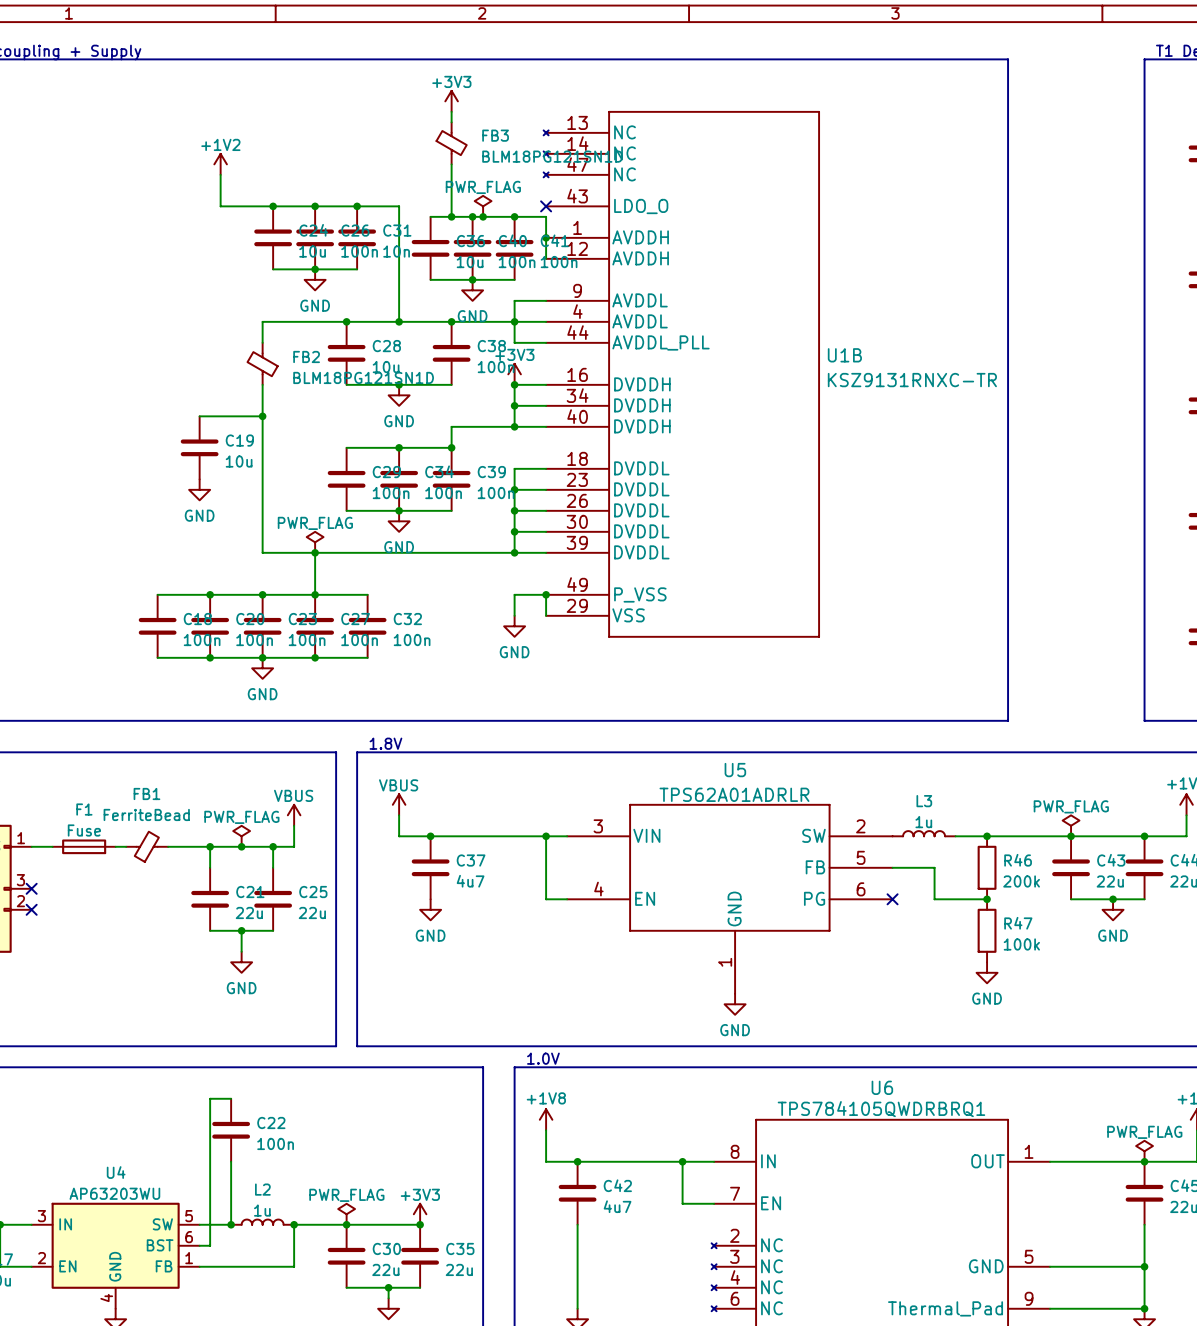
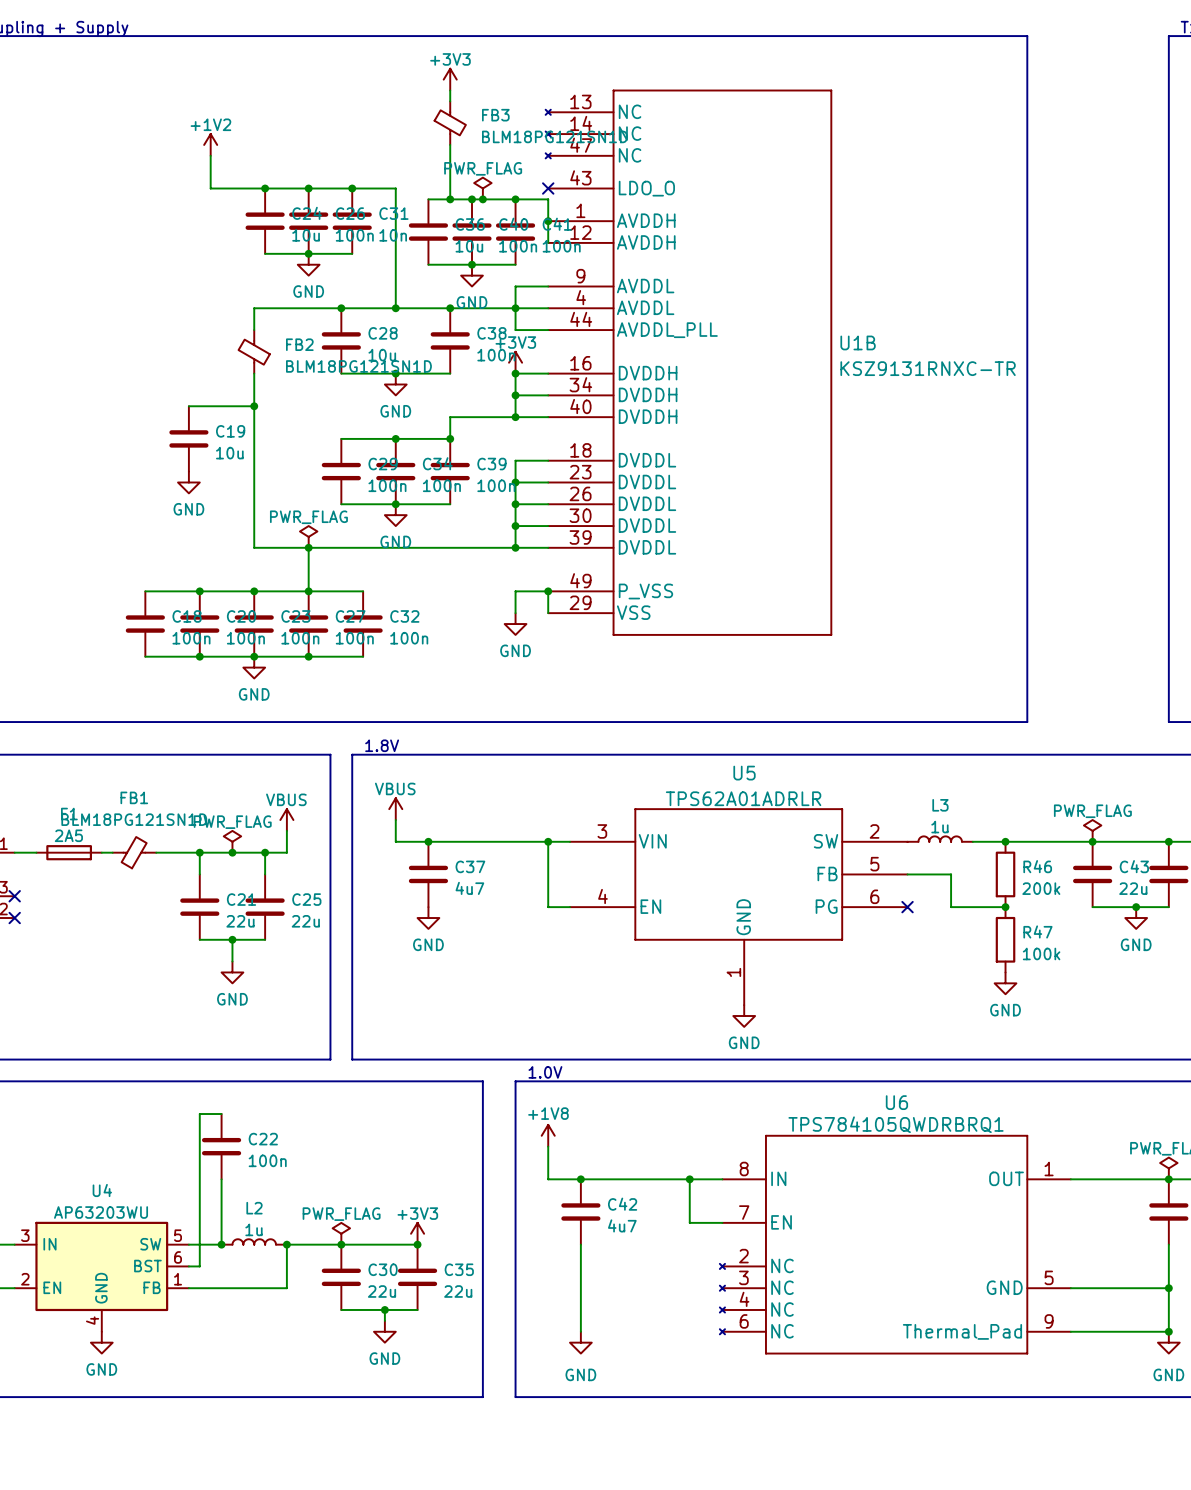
FB1 value: FerriteBead (146, 814) -> BLM18PG121SN1D (134, 819)
F1 value: Fuse (84, 830) -> 2A5 (68, 835)

